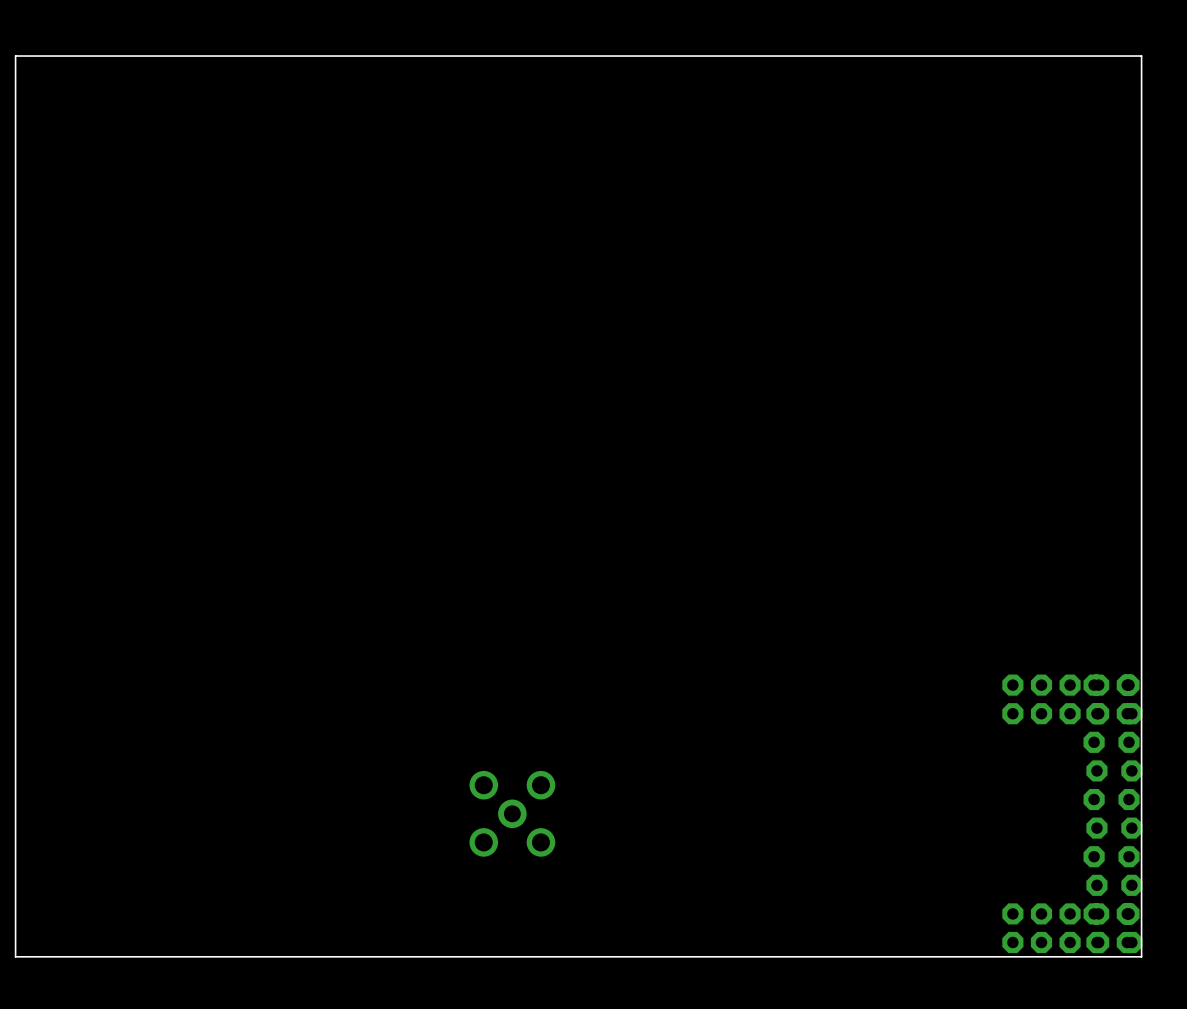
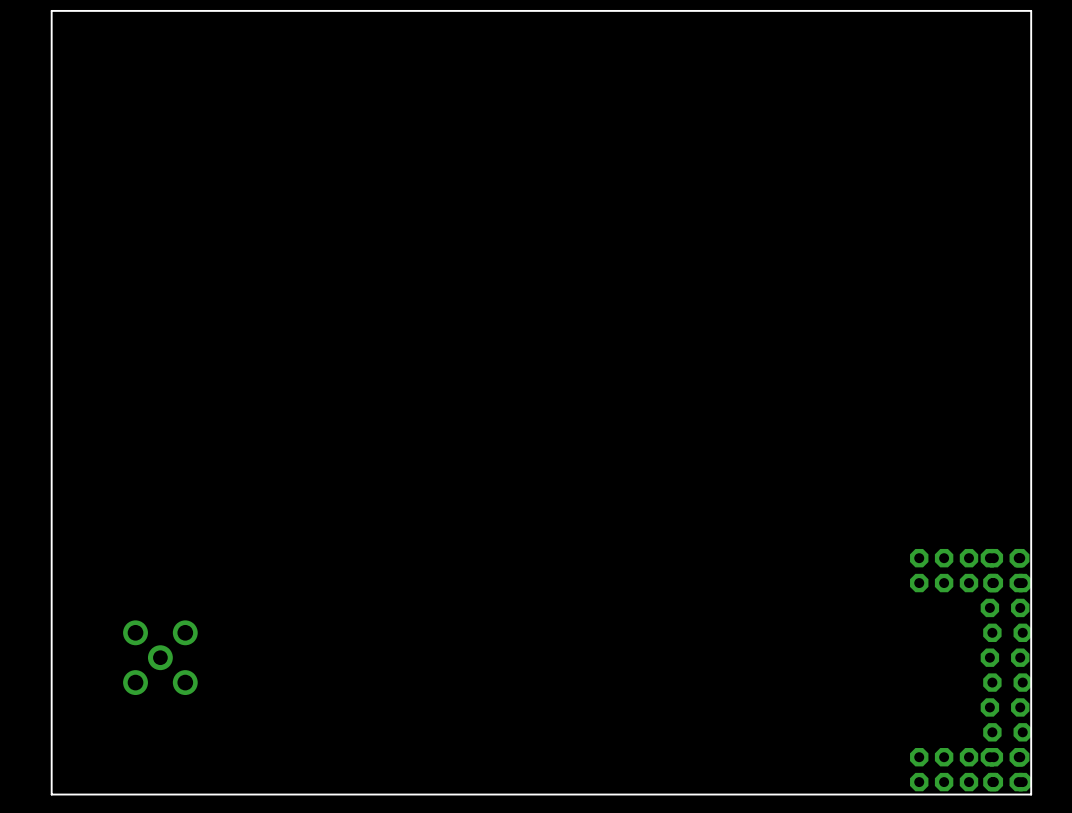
part: none -> (160, 657)
part: (512, 813) -> none

